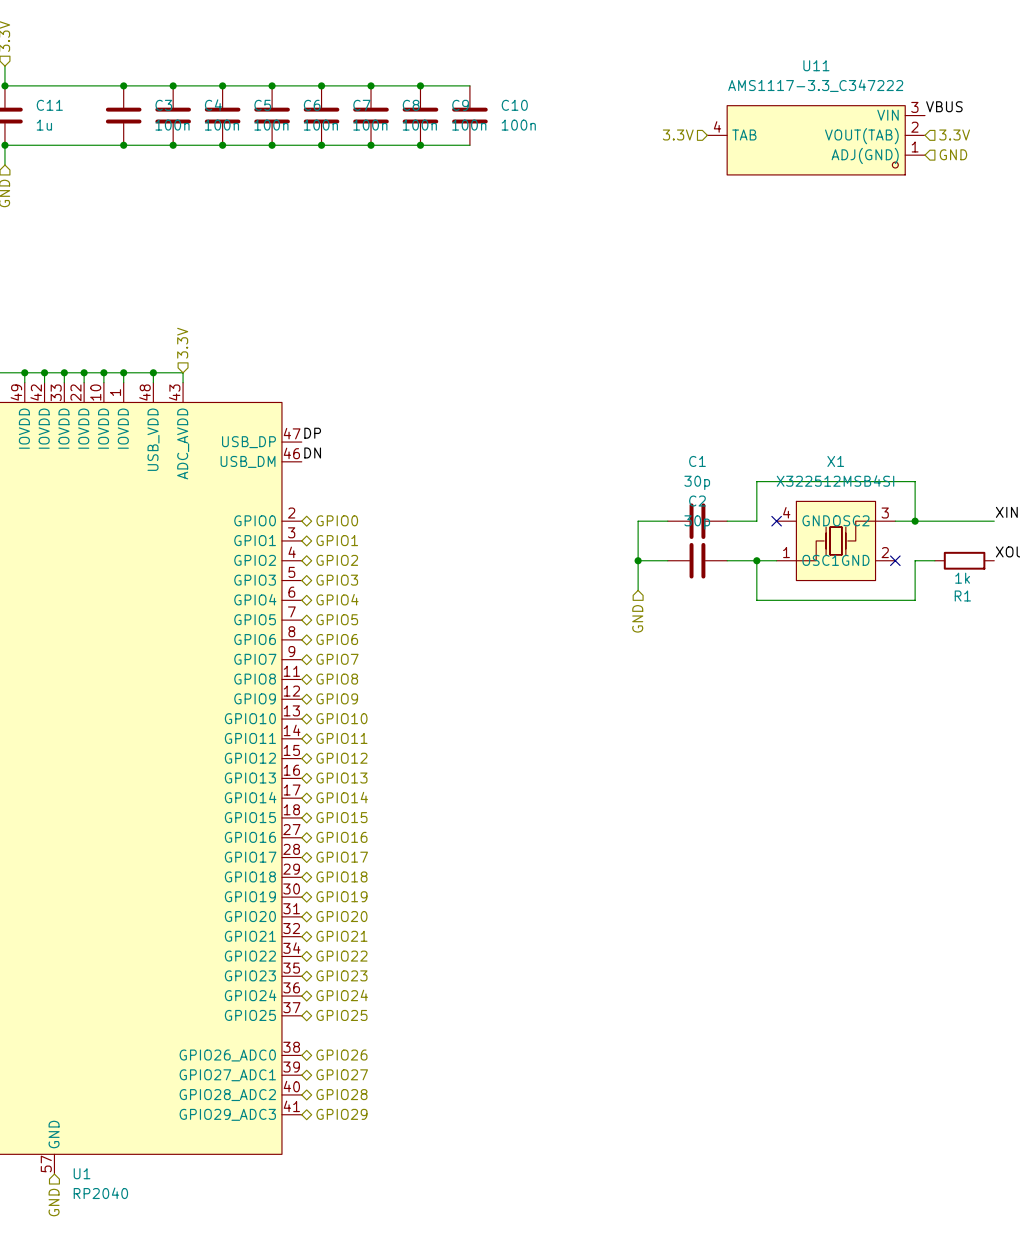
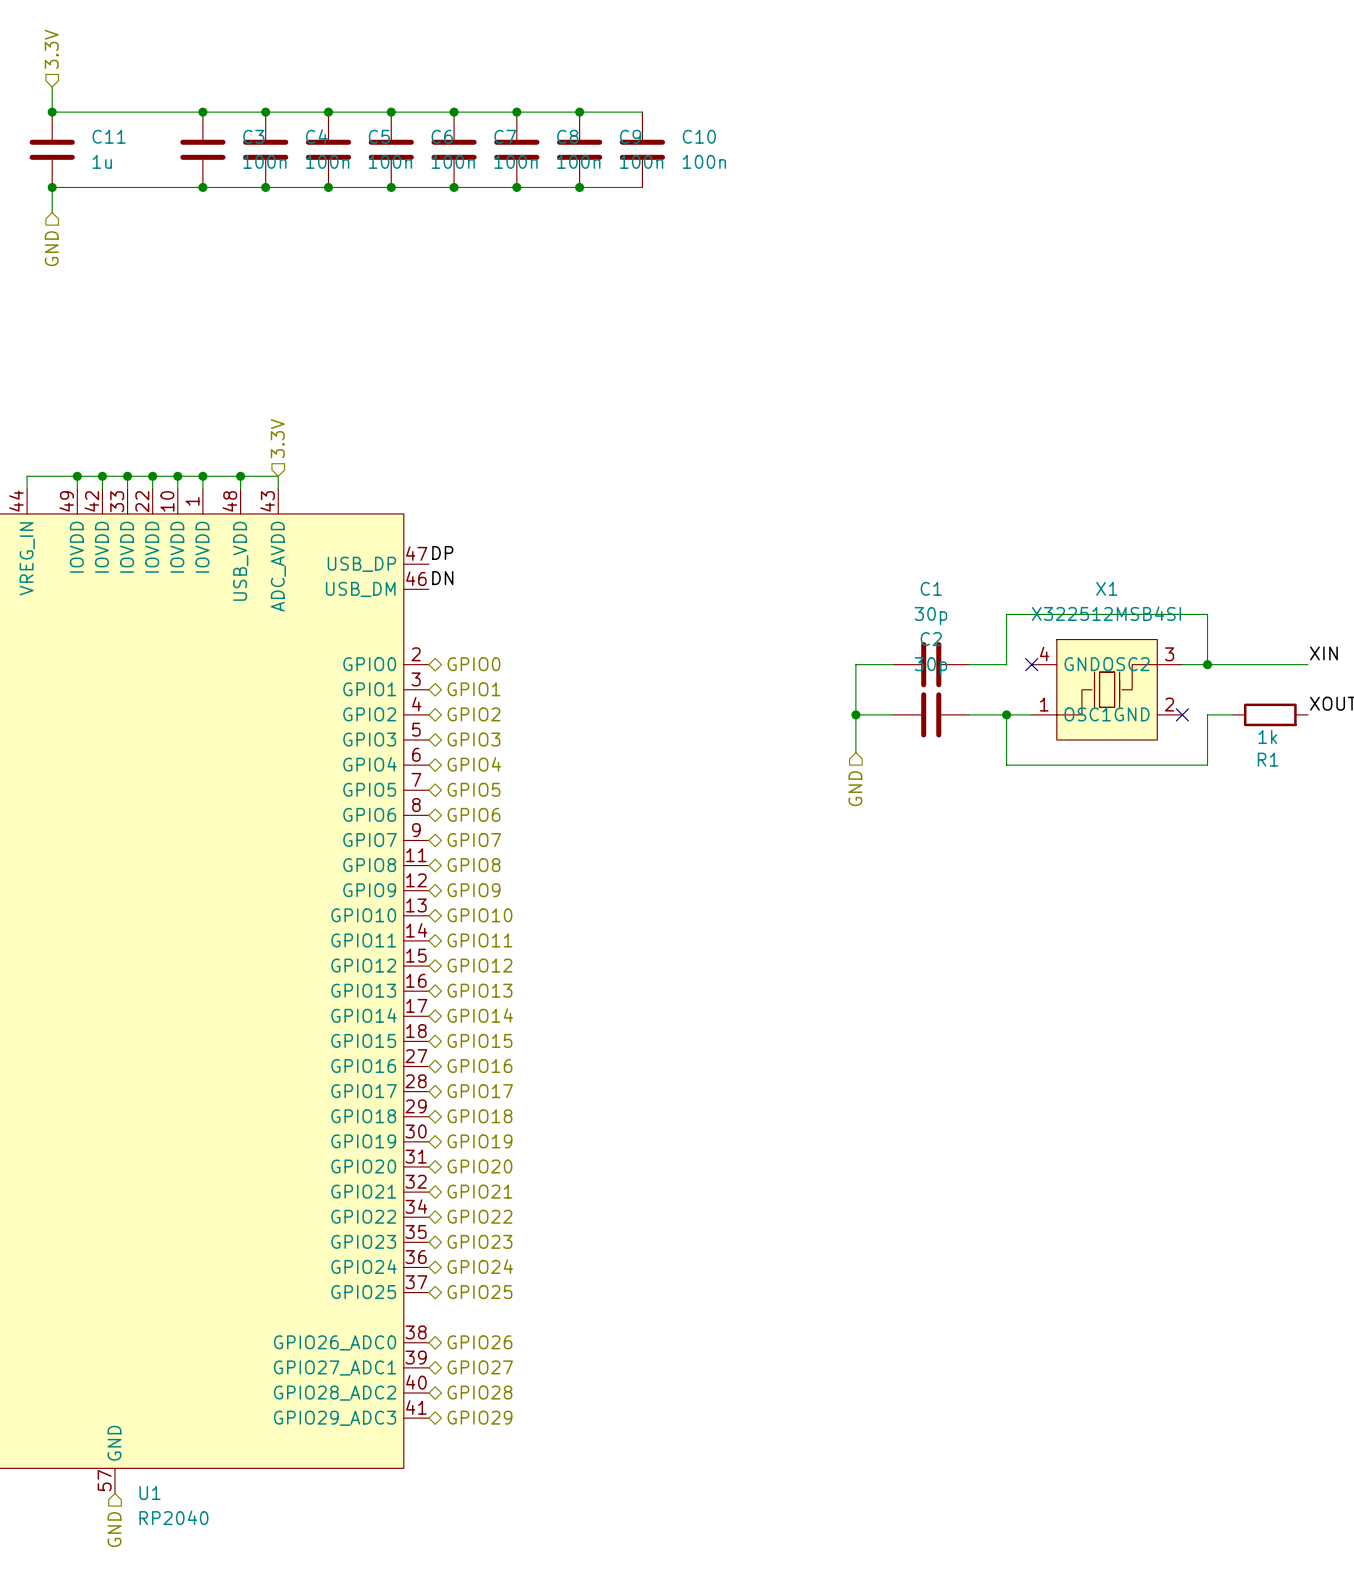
label: VBUS (944, 106) -> none
hierarchical label: 3.3V (678, 134) -> none
hierarchical label: 3.3V (954, 134) -> none
U11: AMS1117-3.3_C347222 (816, 140) -> none
hierarchical label: GND (953, 154) -> none

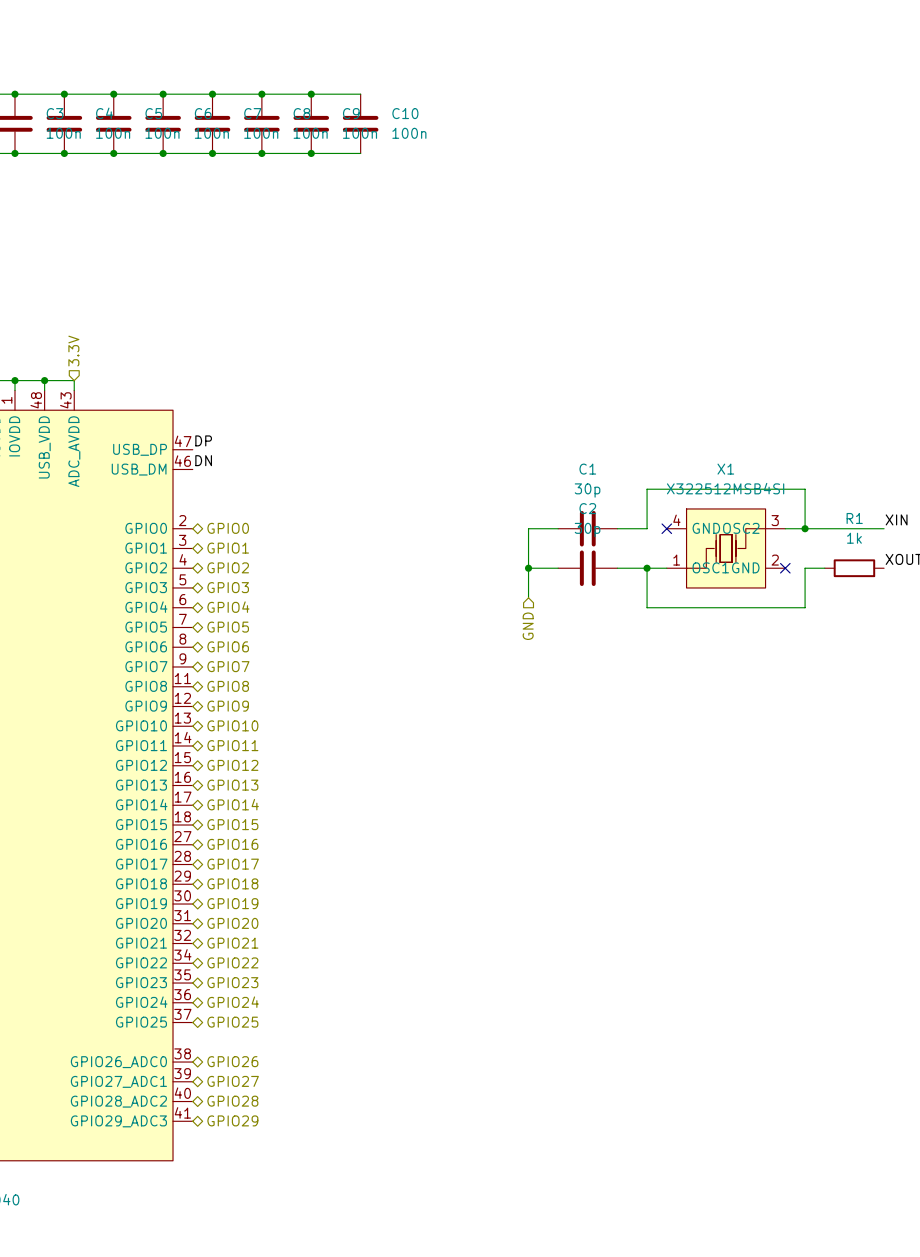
R1 value position: 1k (1267, 737) -> 1k (854, 538)
R1 name position: R1 (1268, 759) -> R1 (854, 518)

